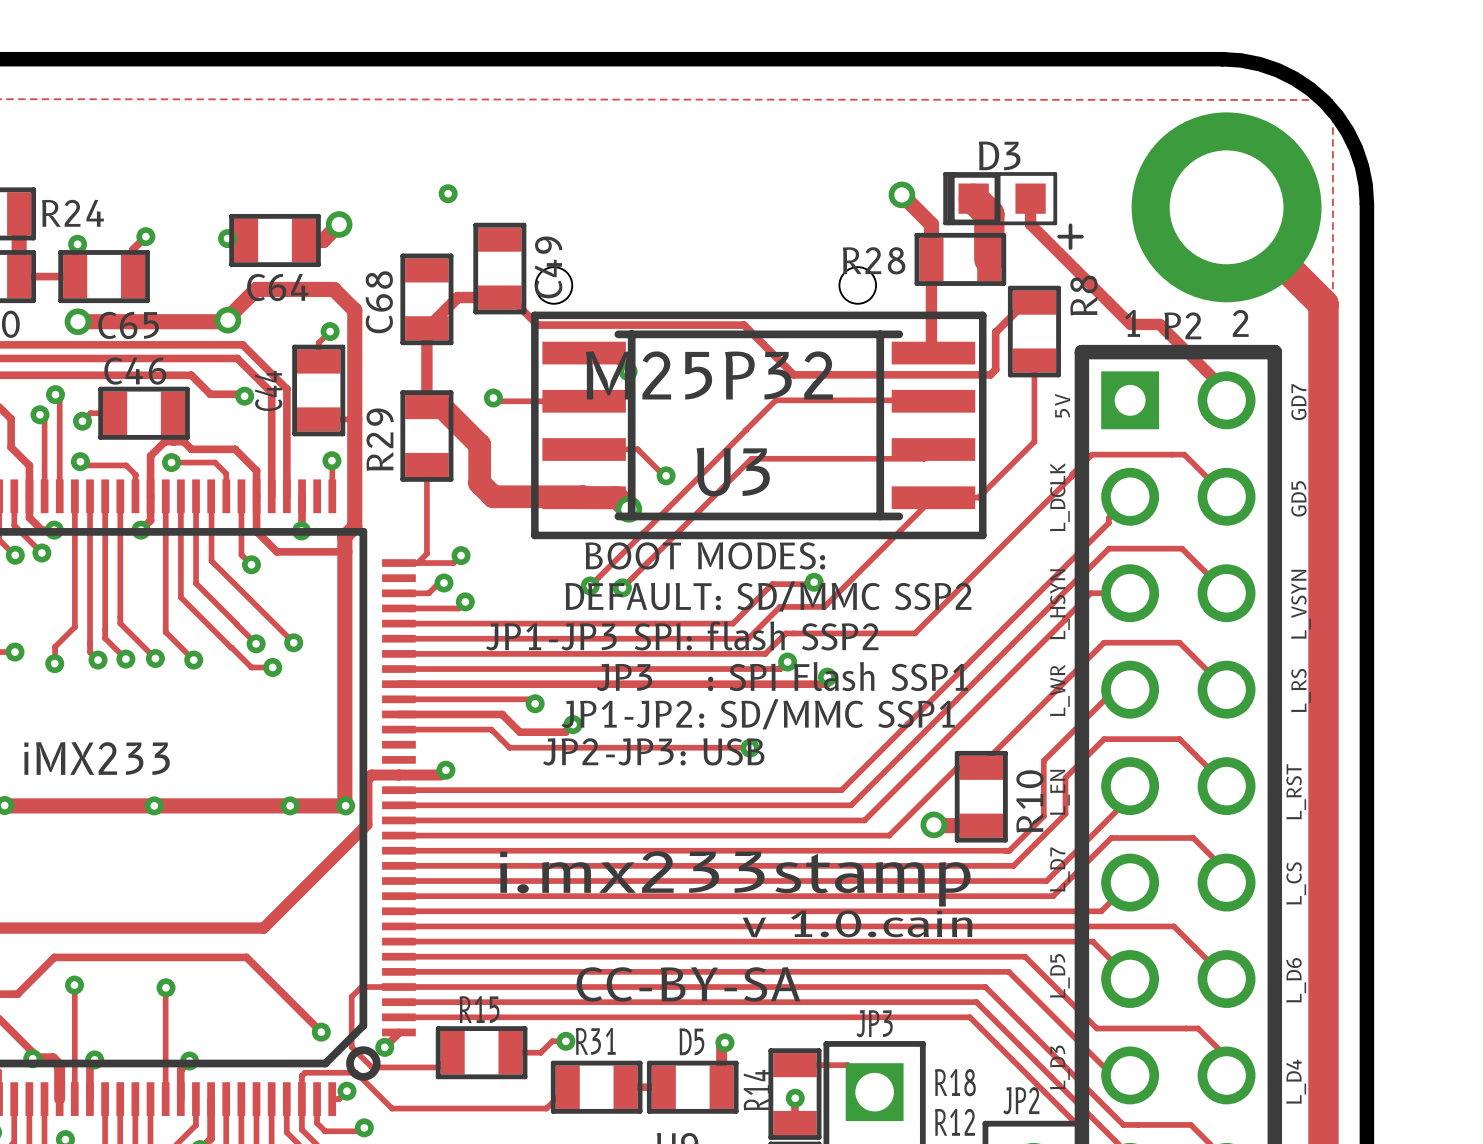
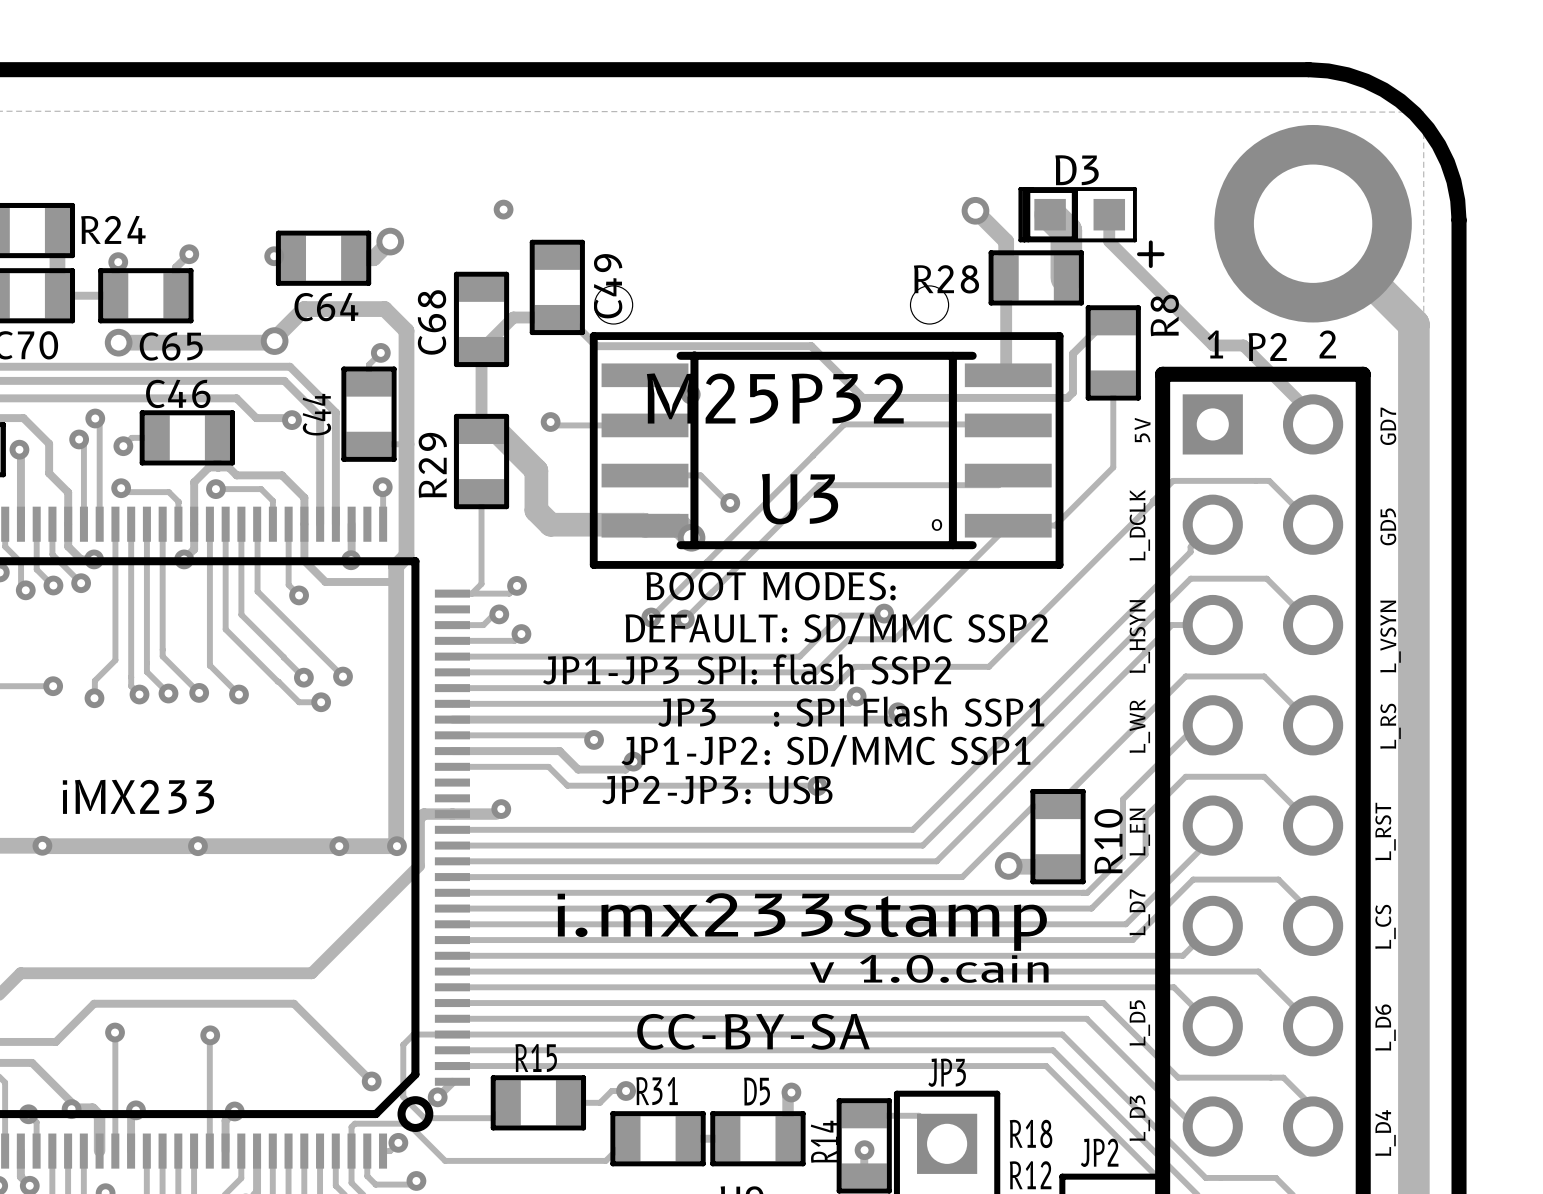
text: none -> o (936, 525)

